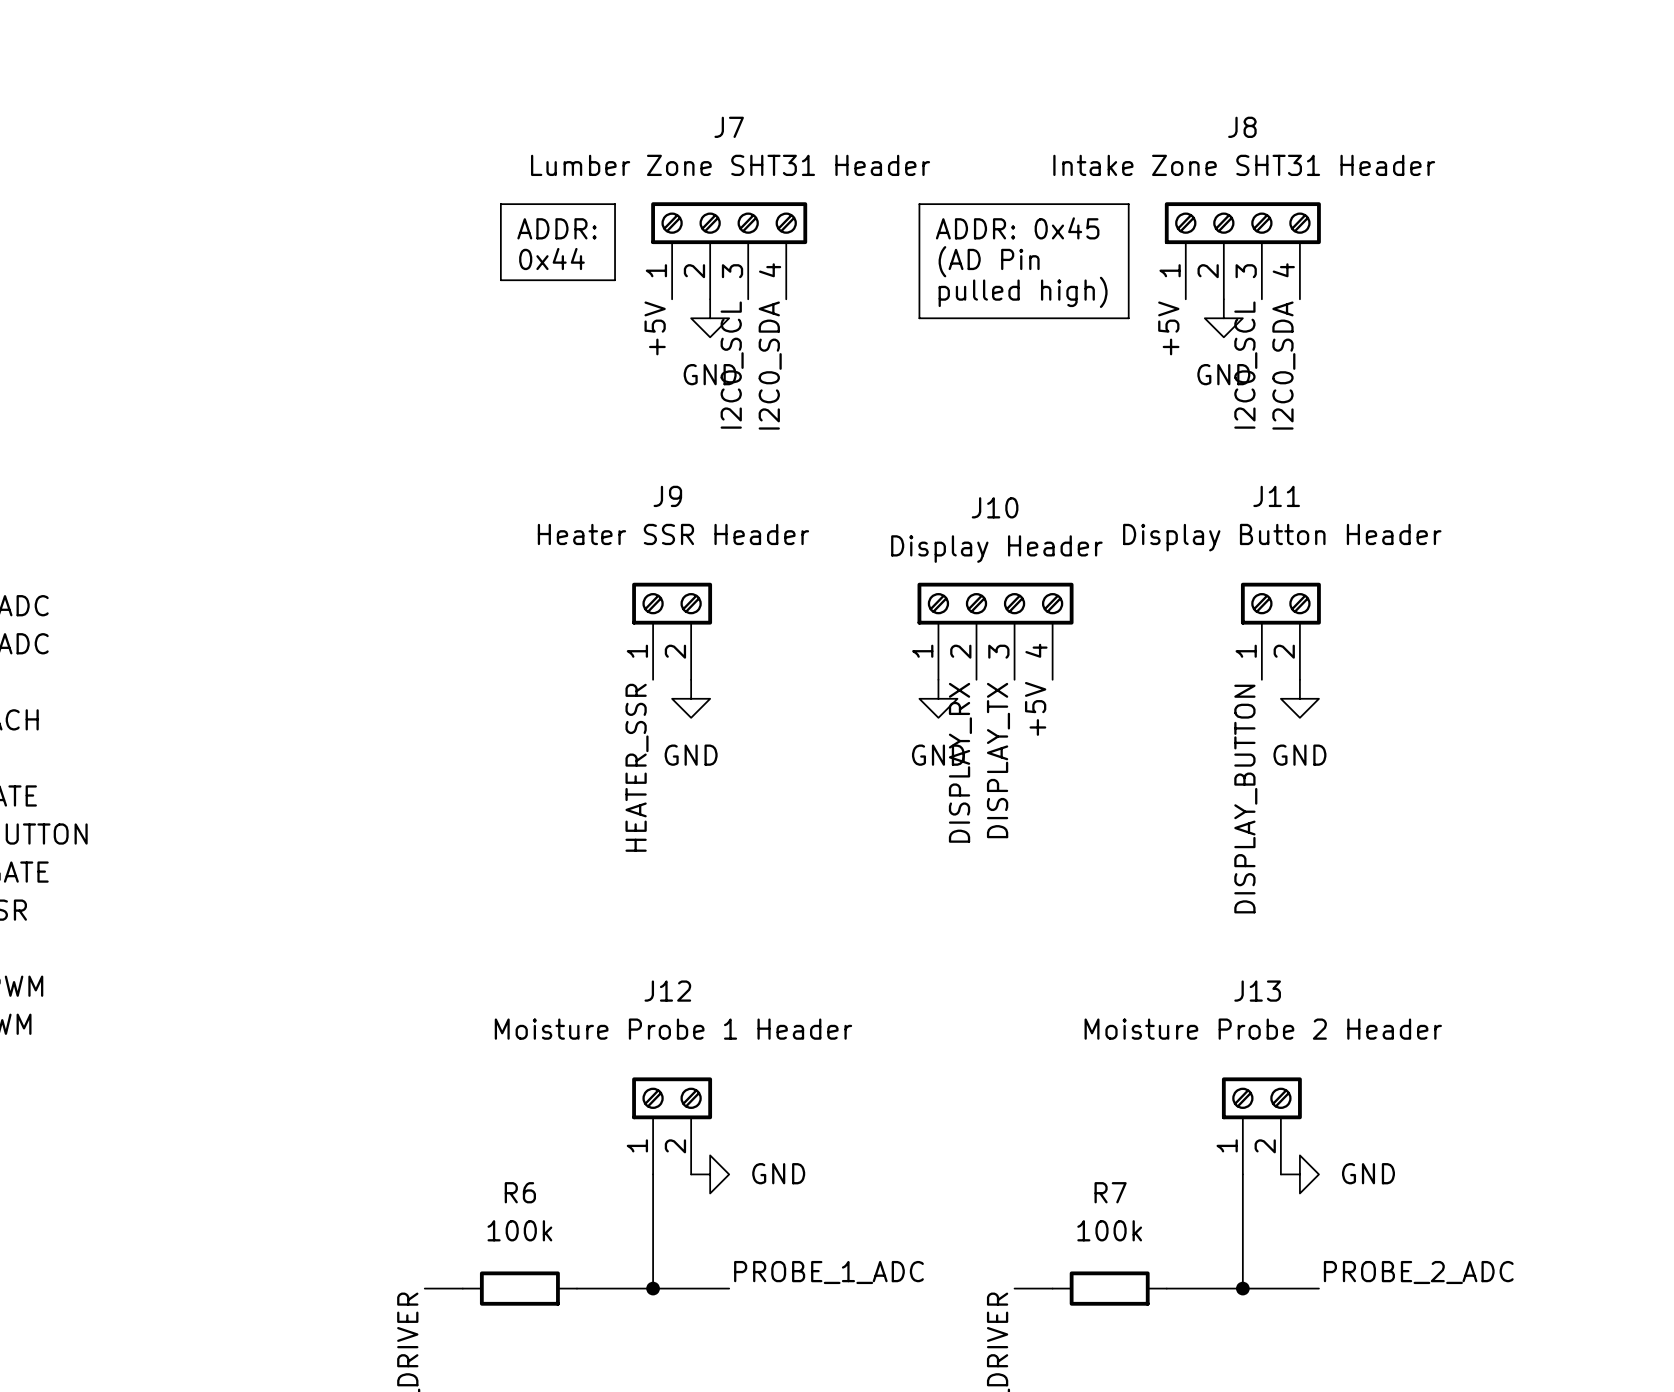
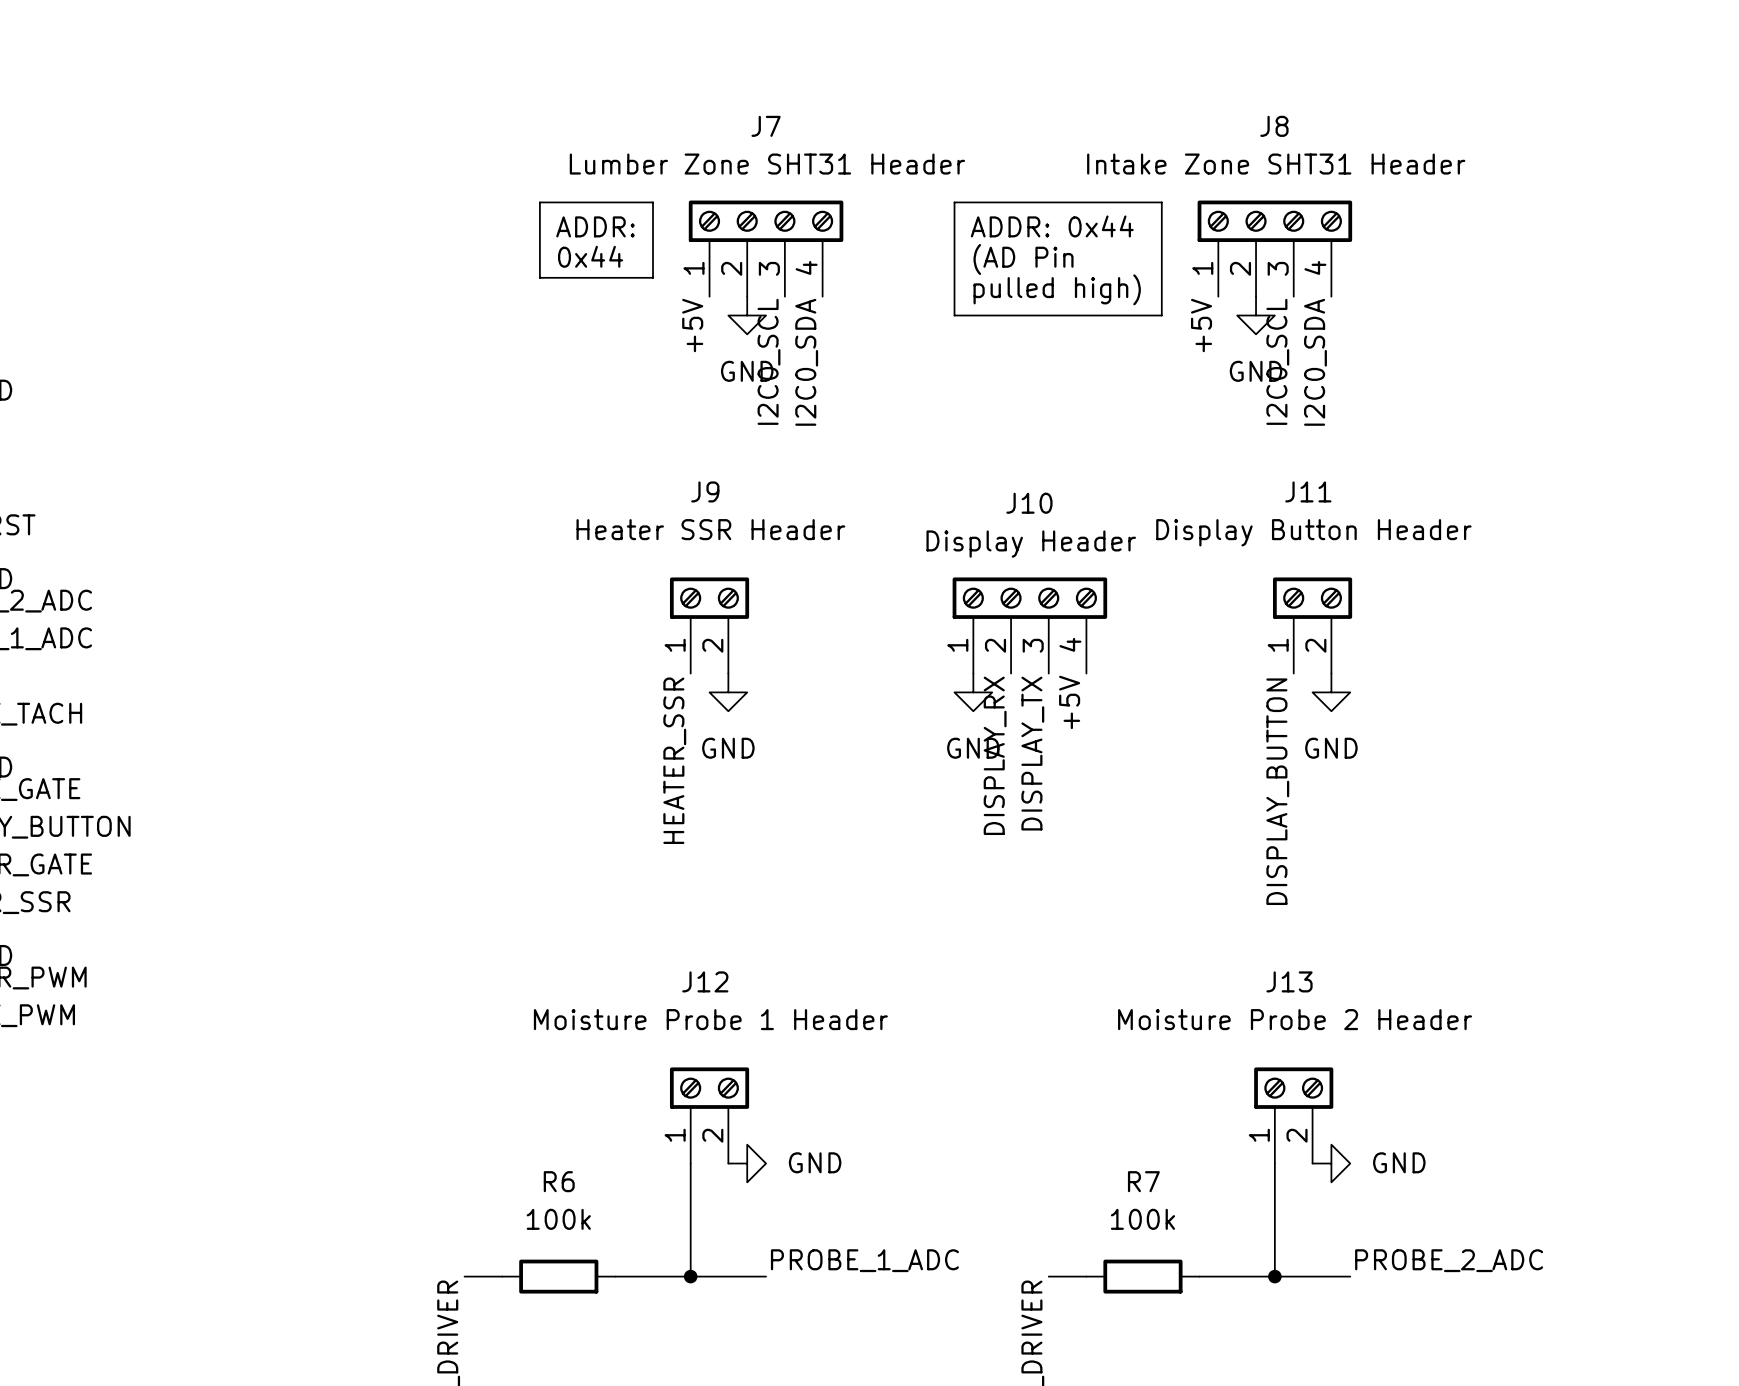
text: ADDR: 0x45 (1017, 228) -> ADDR: 0x44 (1052, 226)

